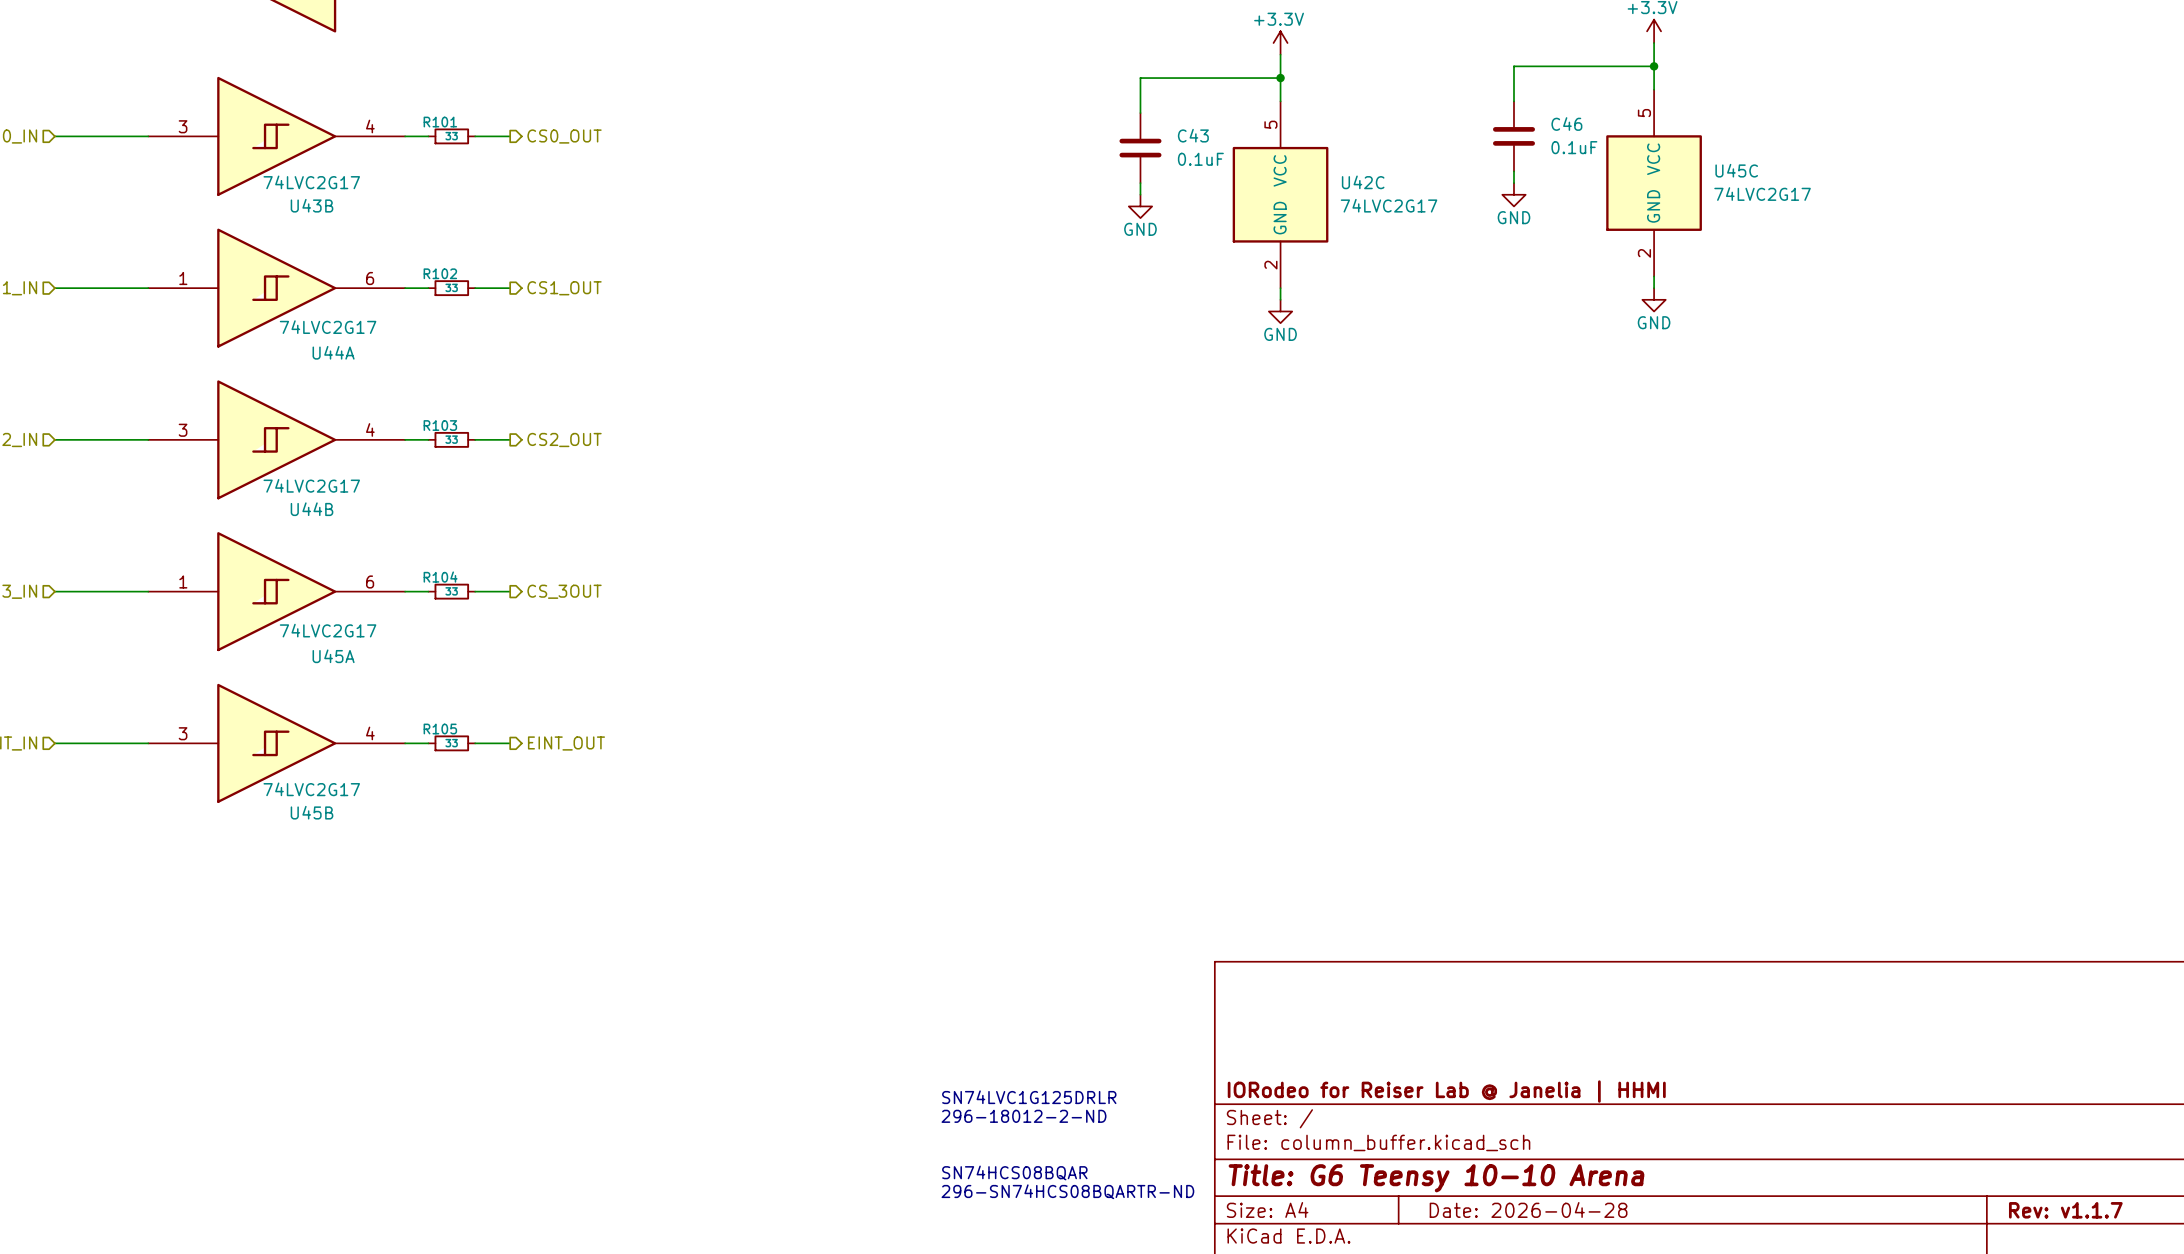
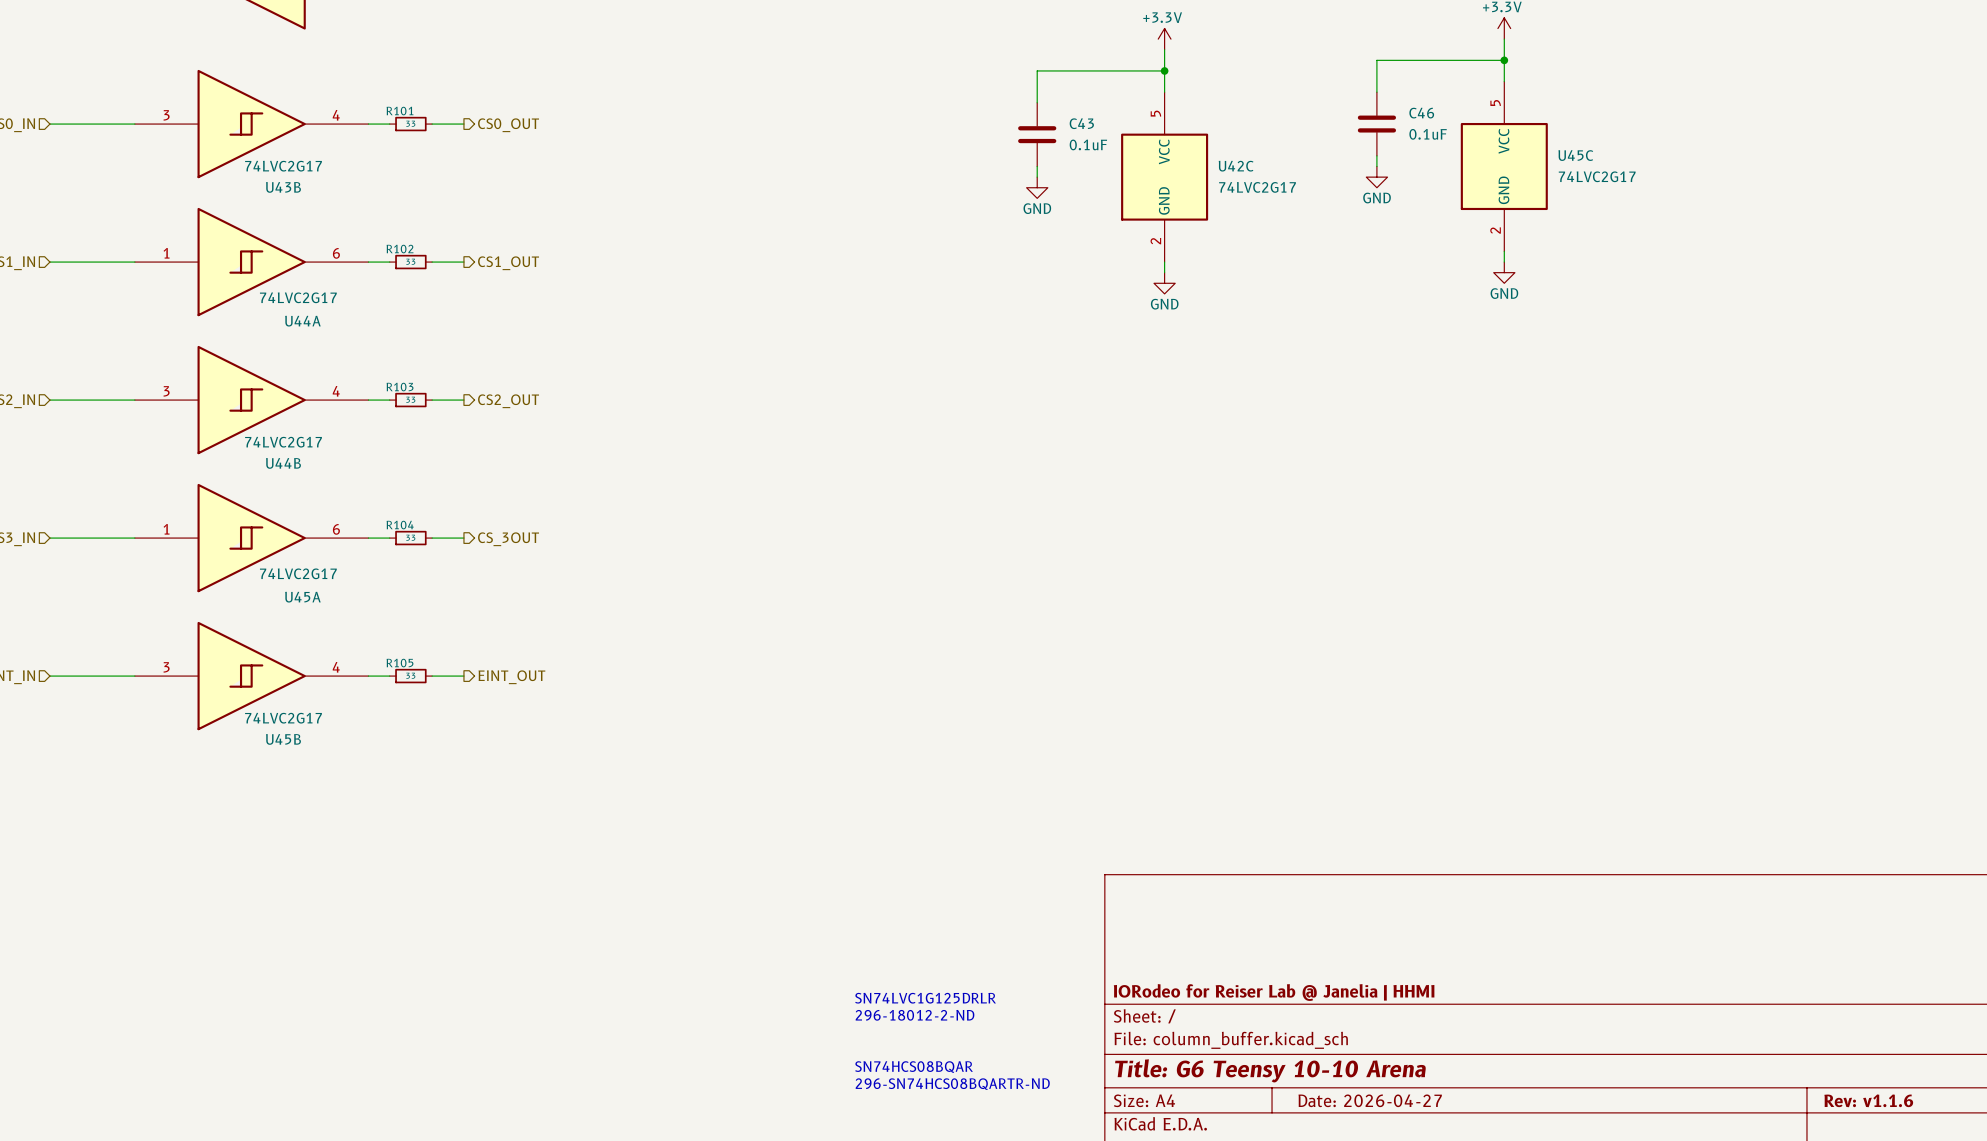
title block: Date: 2026-04-28 (1528, 1209) -> Date: 2026-04-27 (1370, 1100)
title block: Rev: v1.1.7 (2065, 1210) -> Rev: v1.1.6 (1868, 1100)

